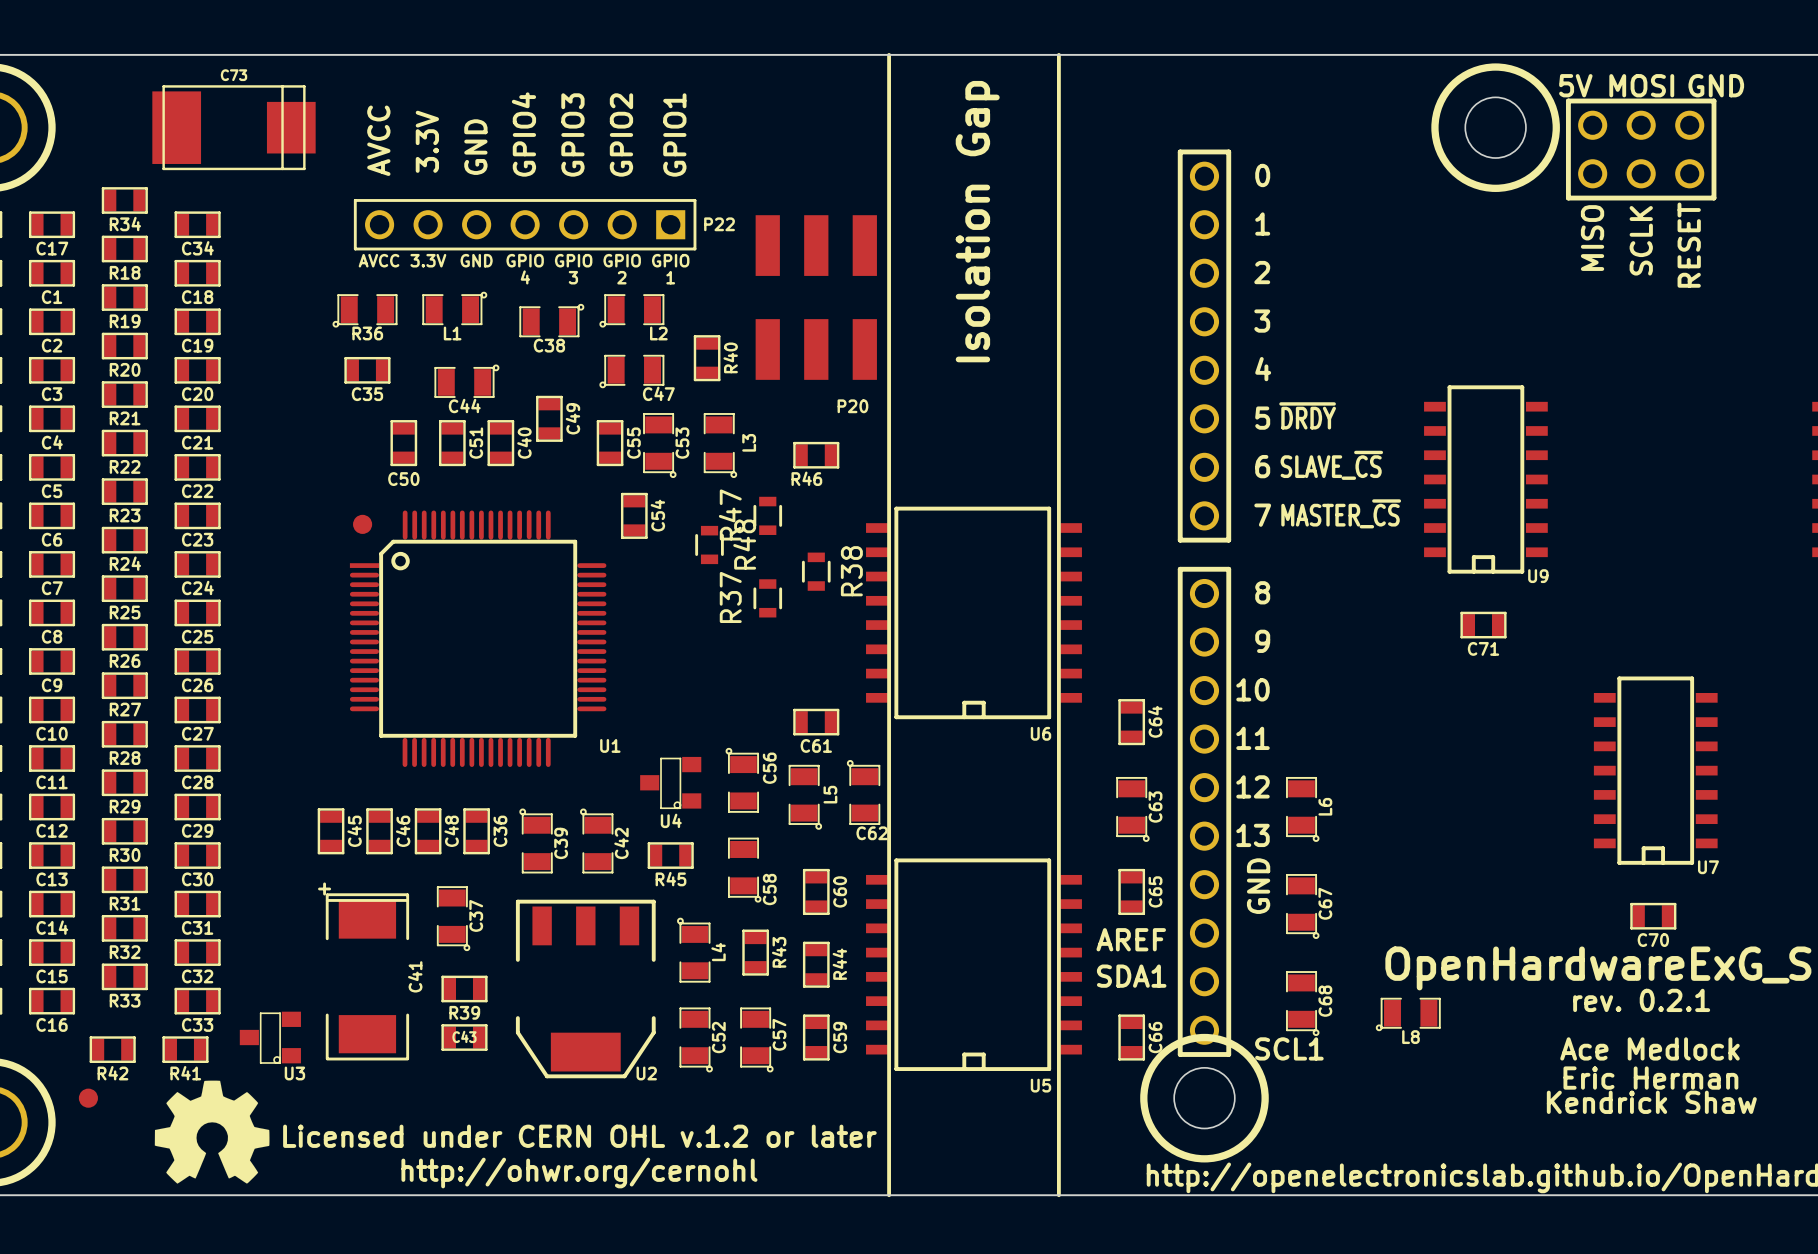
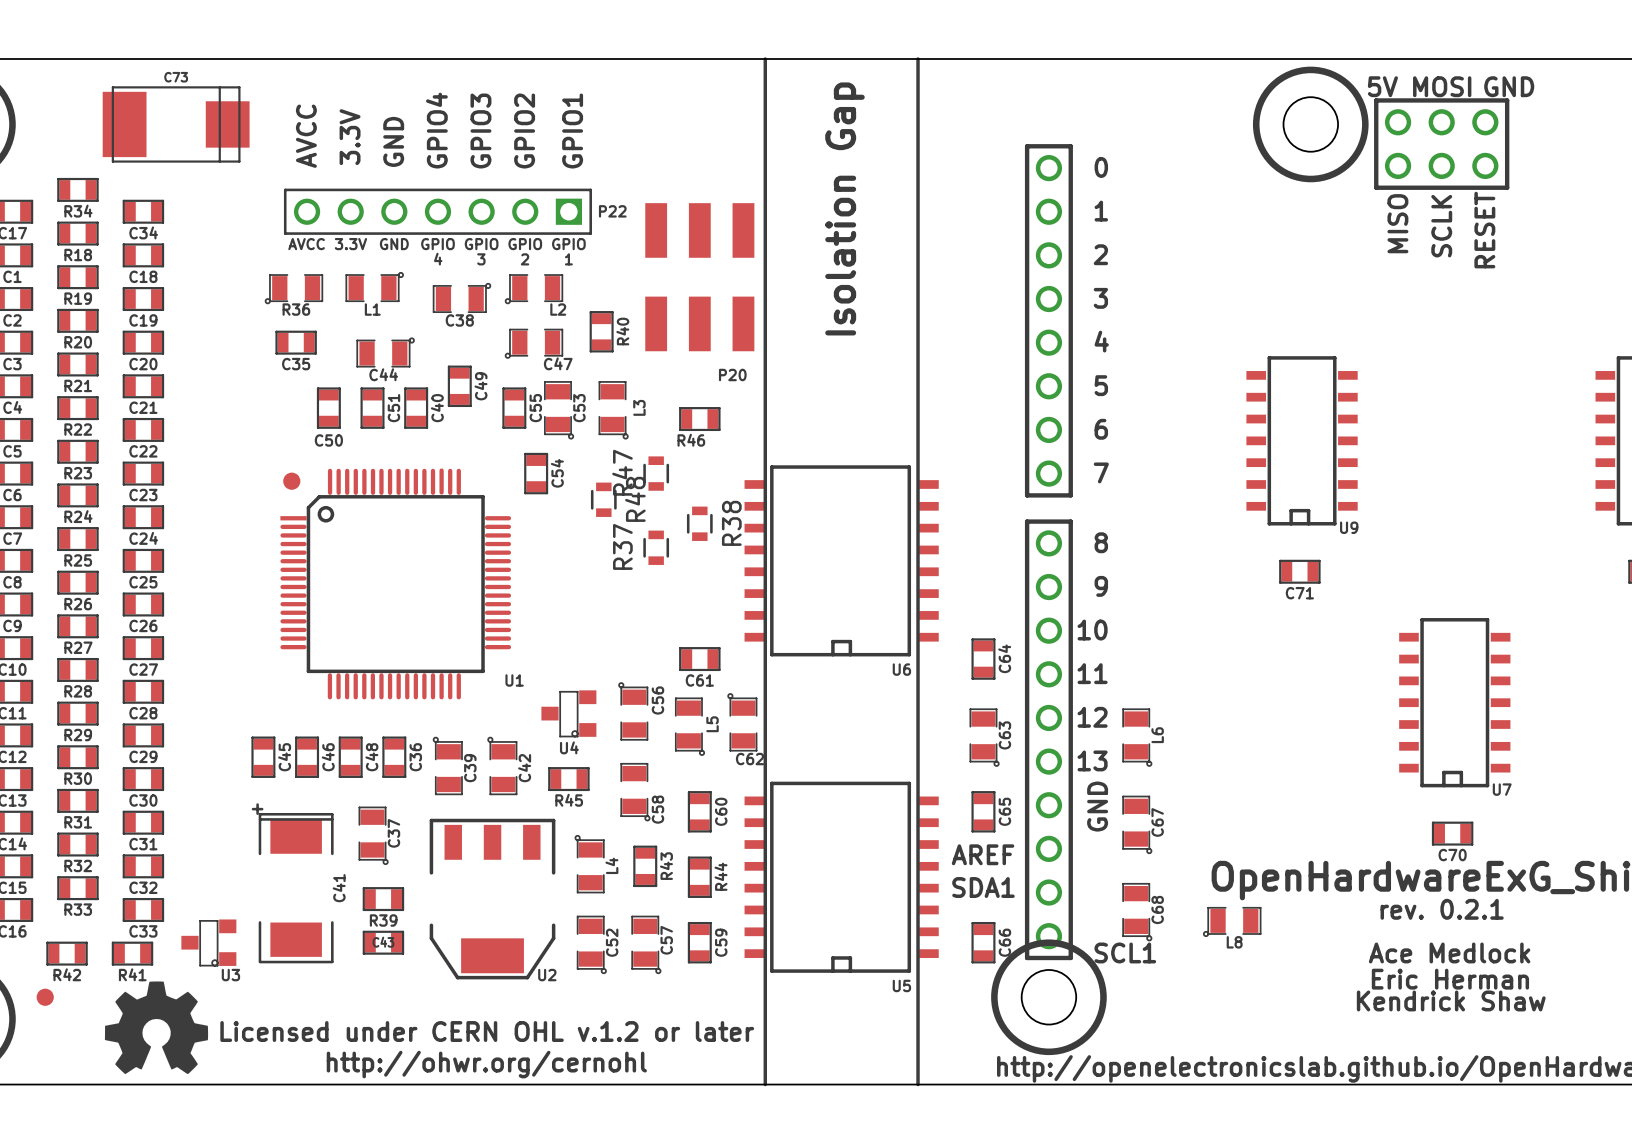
text: ~{DRDY} (1307, 415) -> none
text: SLAVE_~{CS} (1331, 465) -> none
text: MASTER_~{CS} (1341, 513) -> none

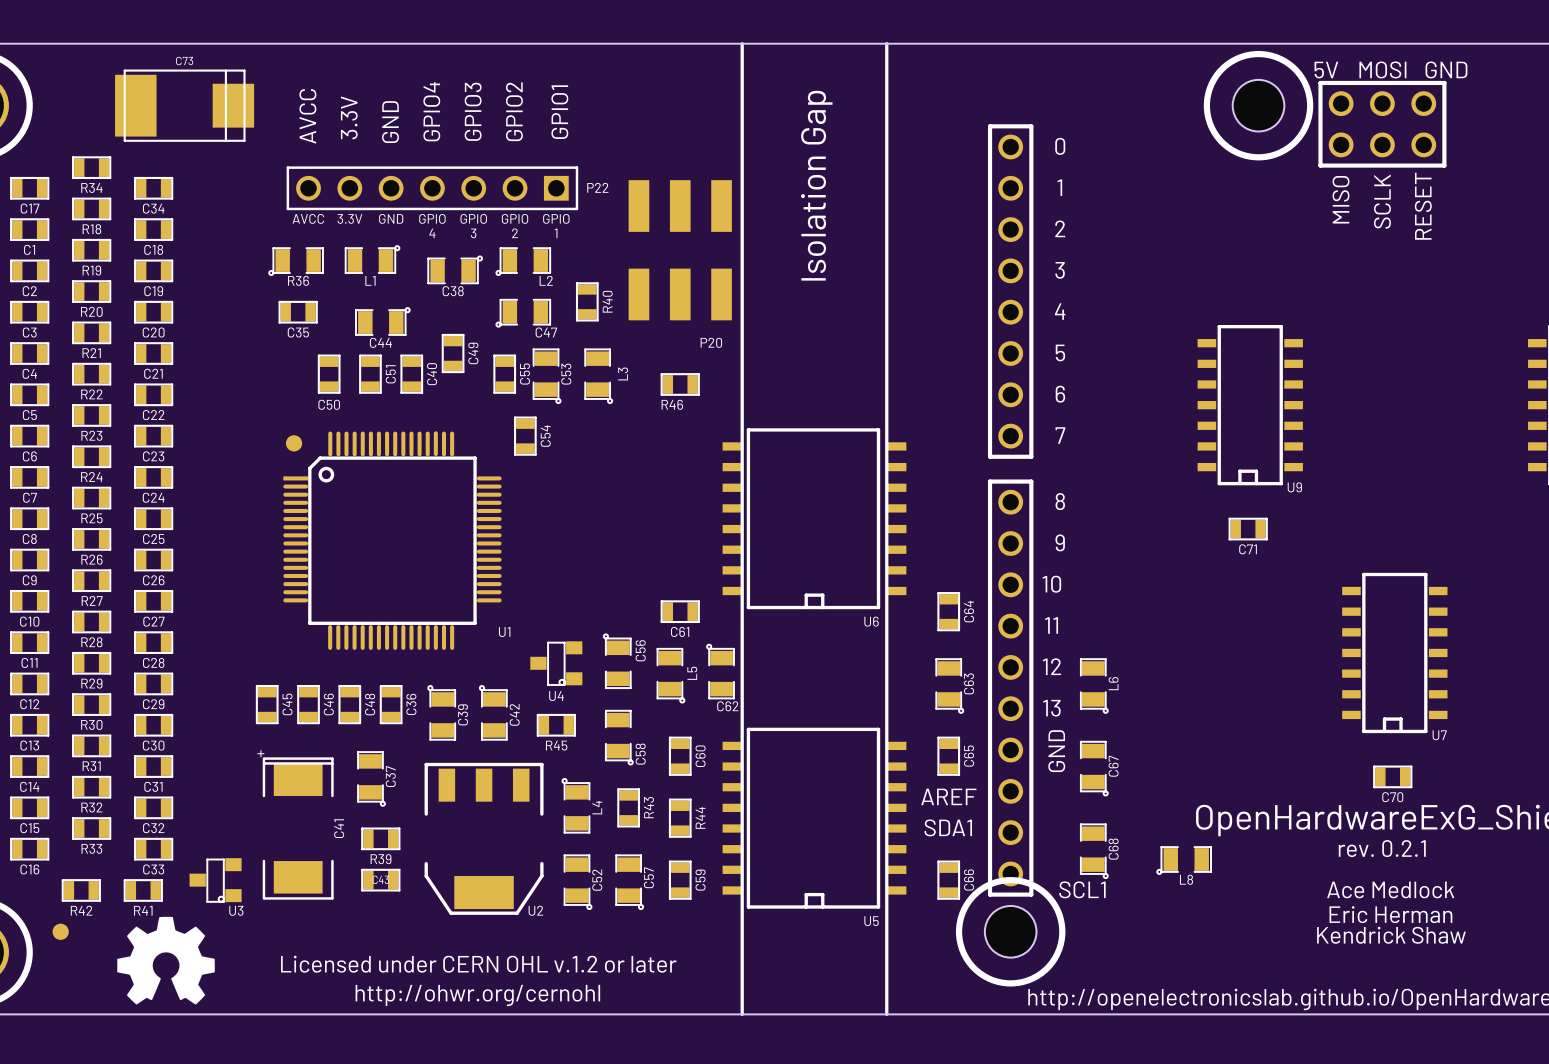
R47: (656, 473) -> none
R48: (603, 499) -> none
R38: (699, 523) -> none
R37: (656, 547) -> none

